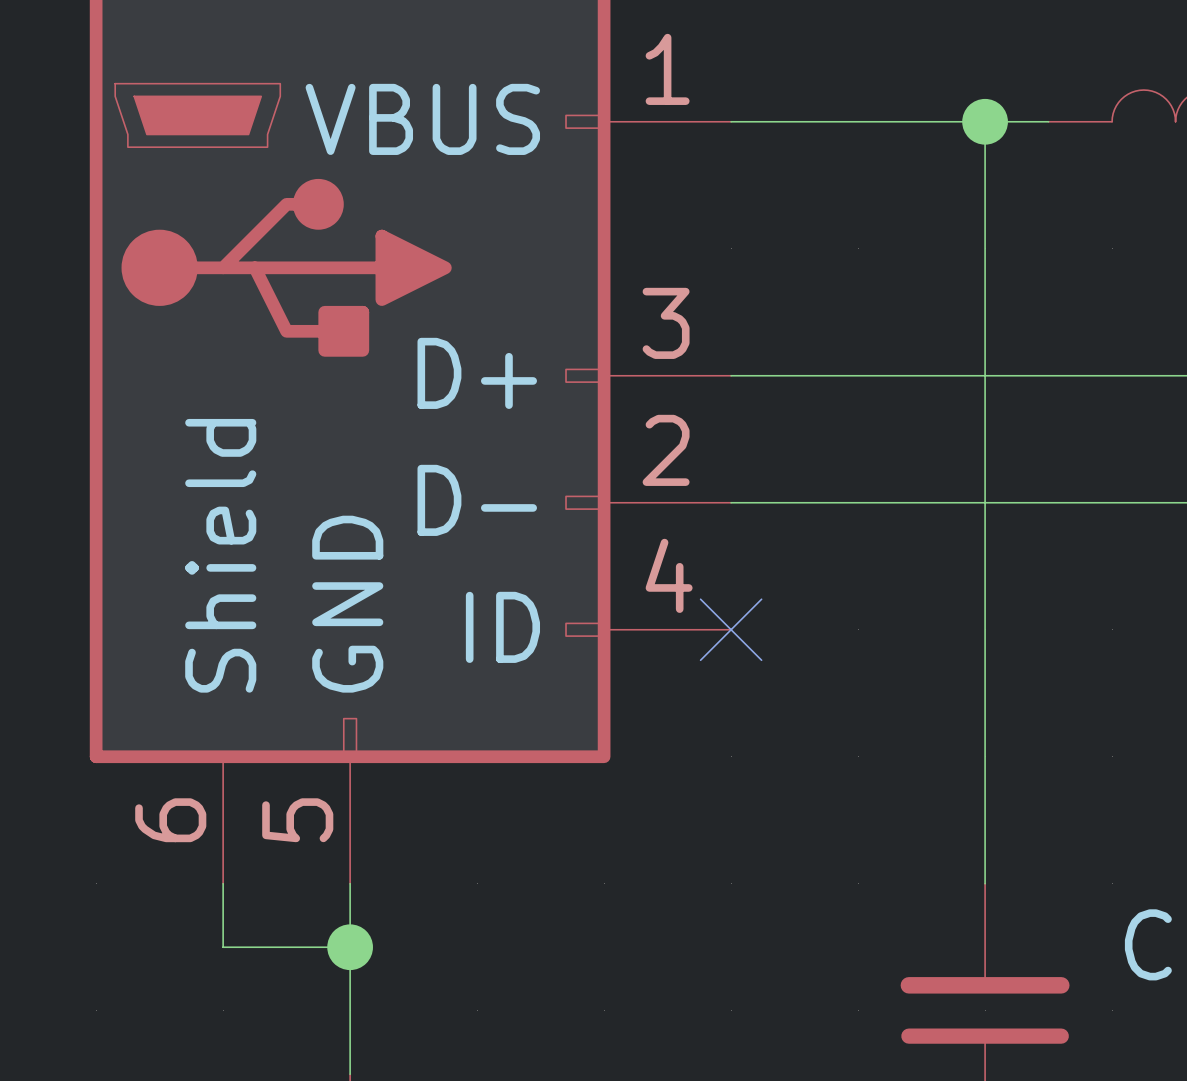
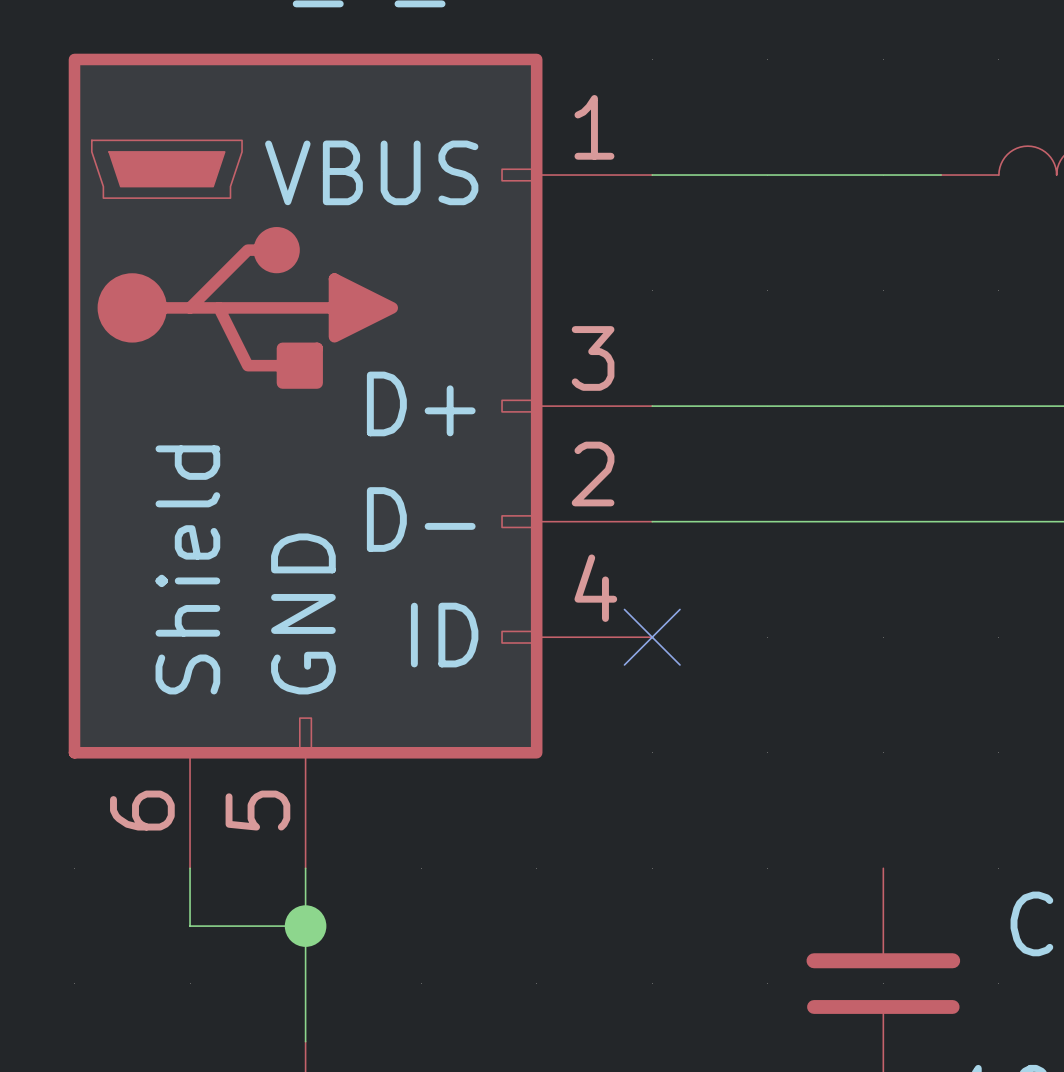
wire: (985, 121) (985, 883) -> none
junction: (985, 121) -> none

